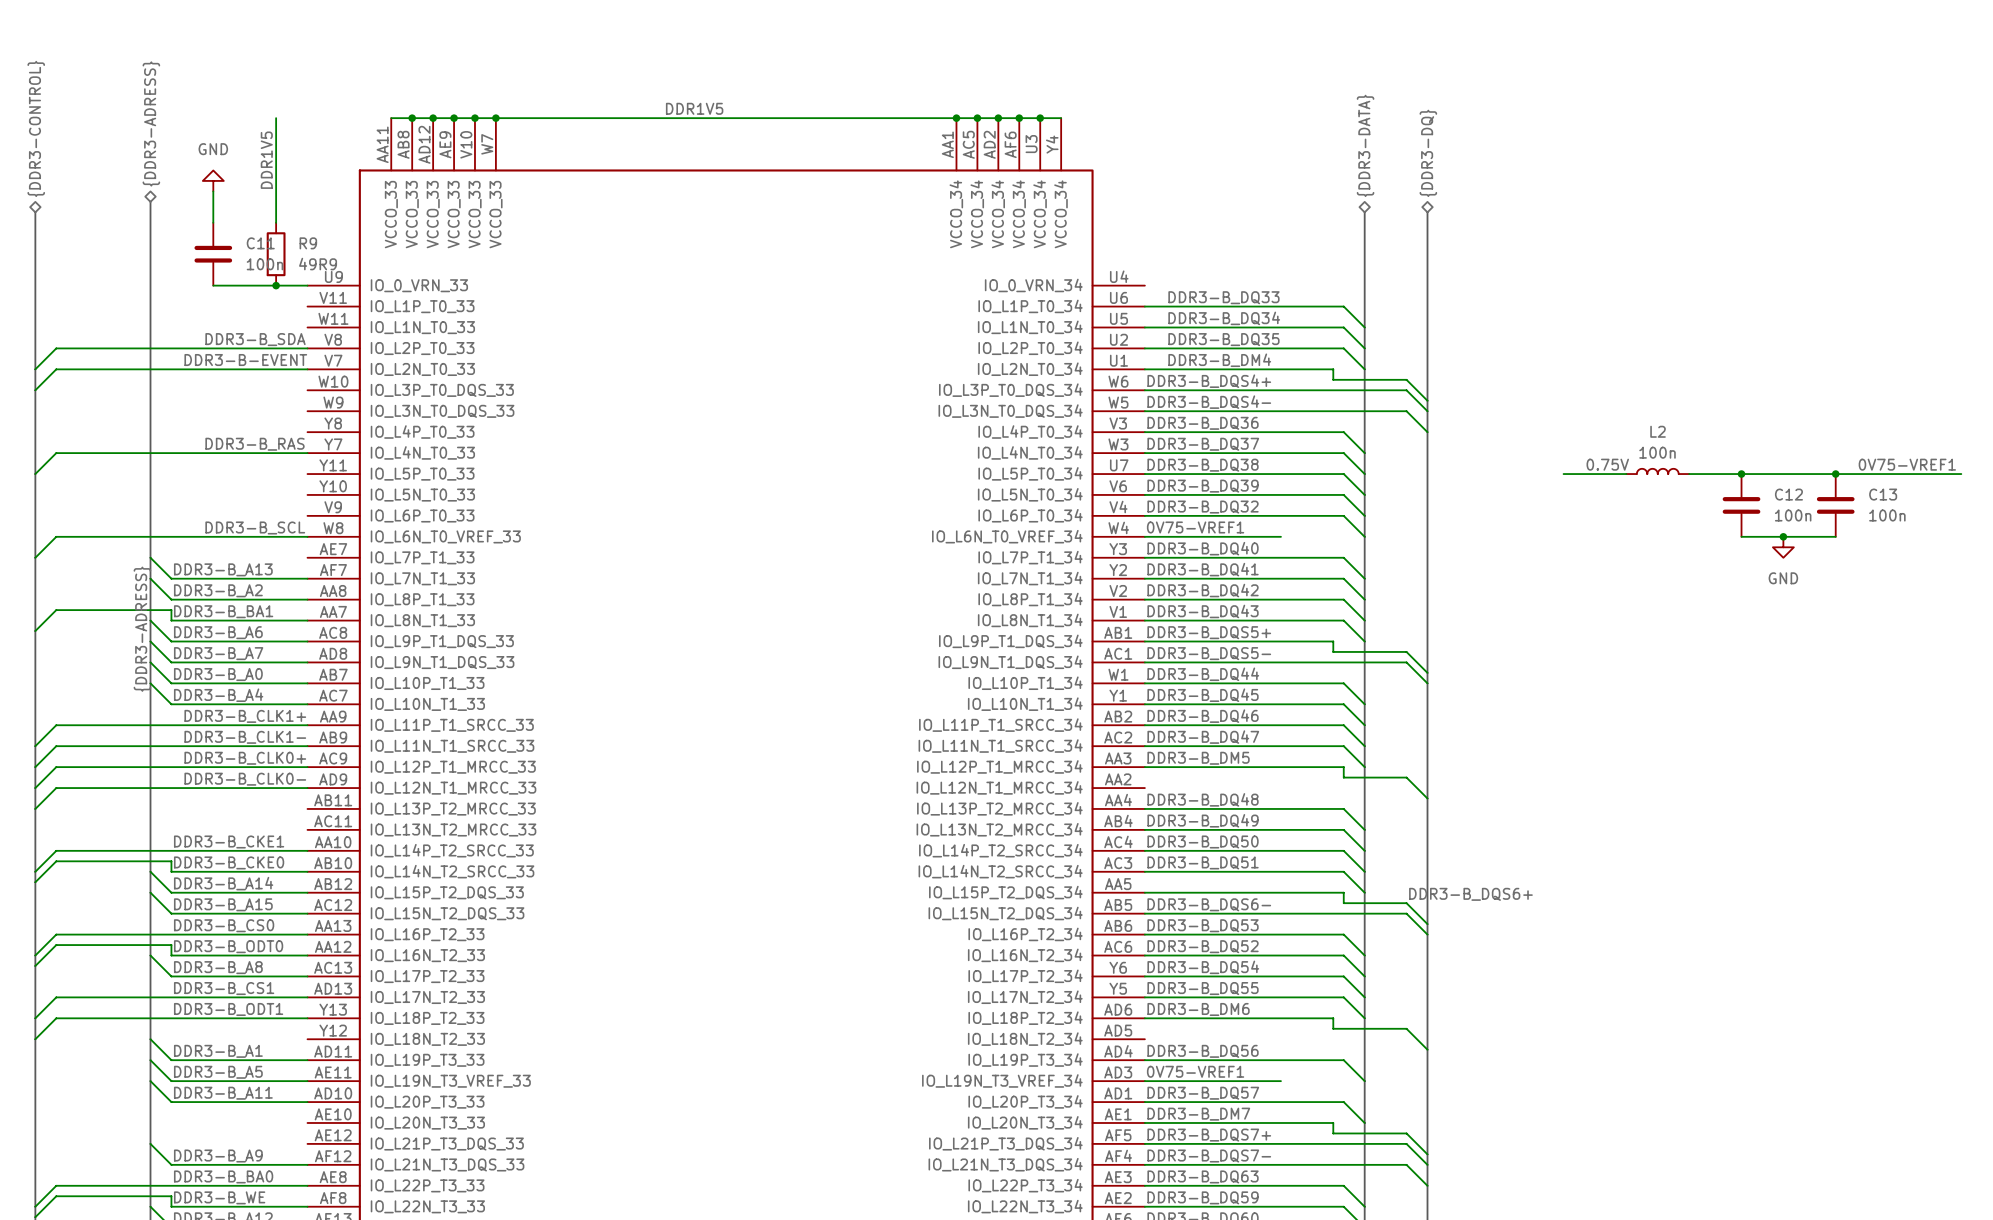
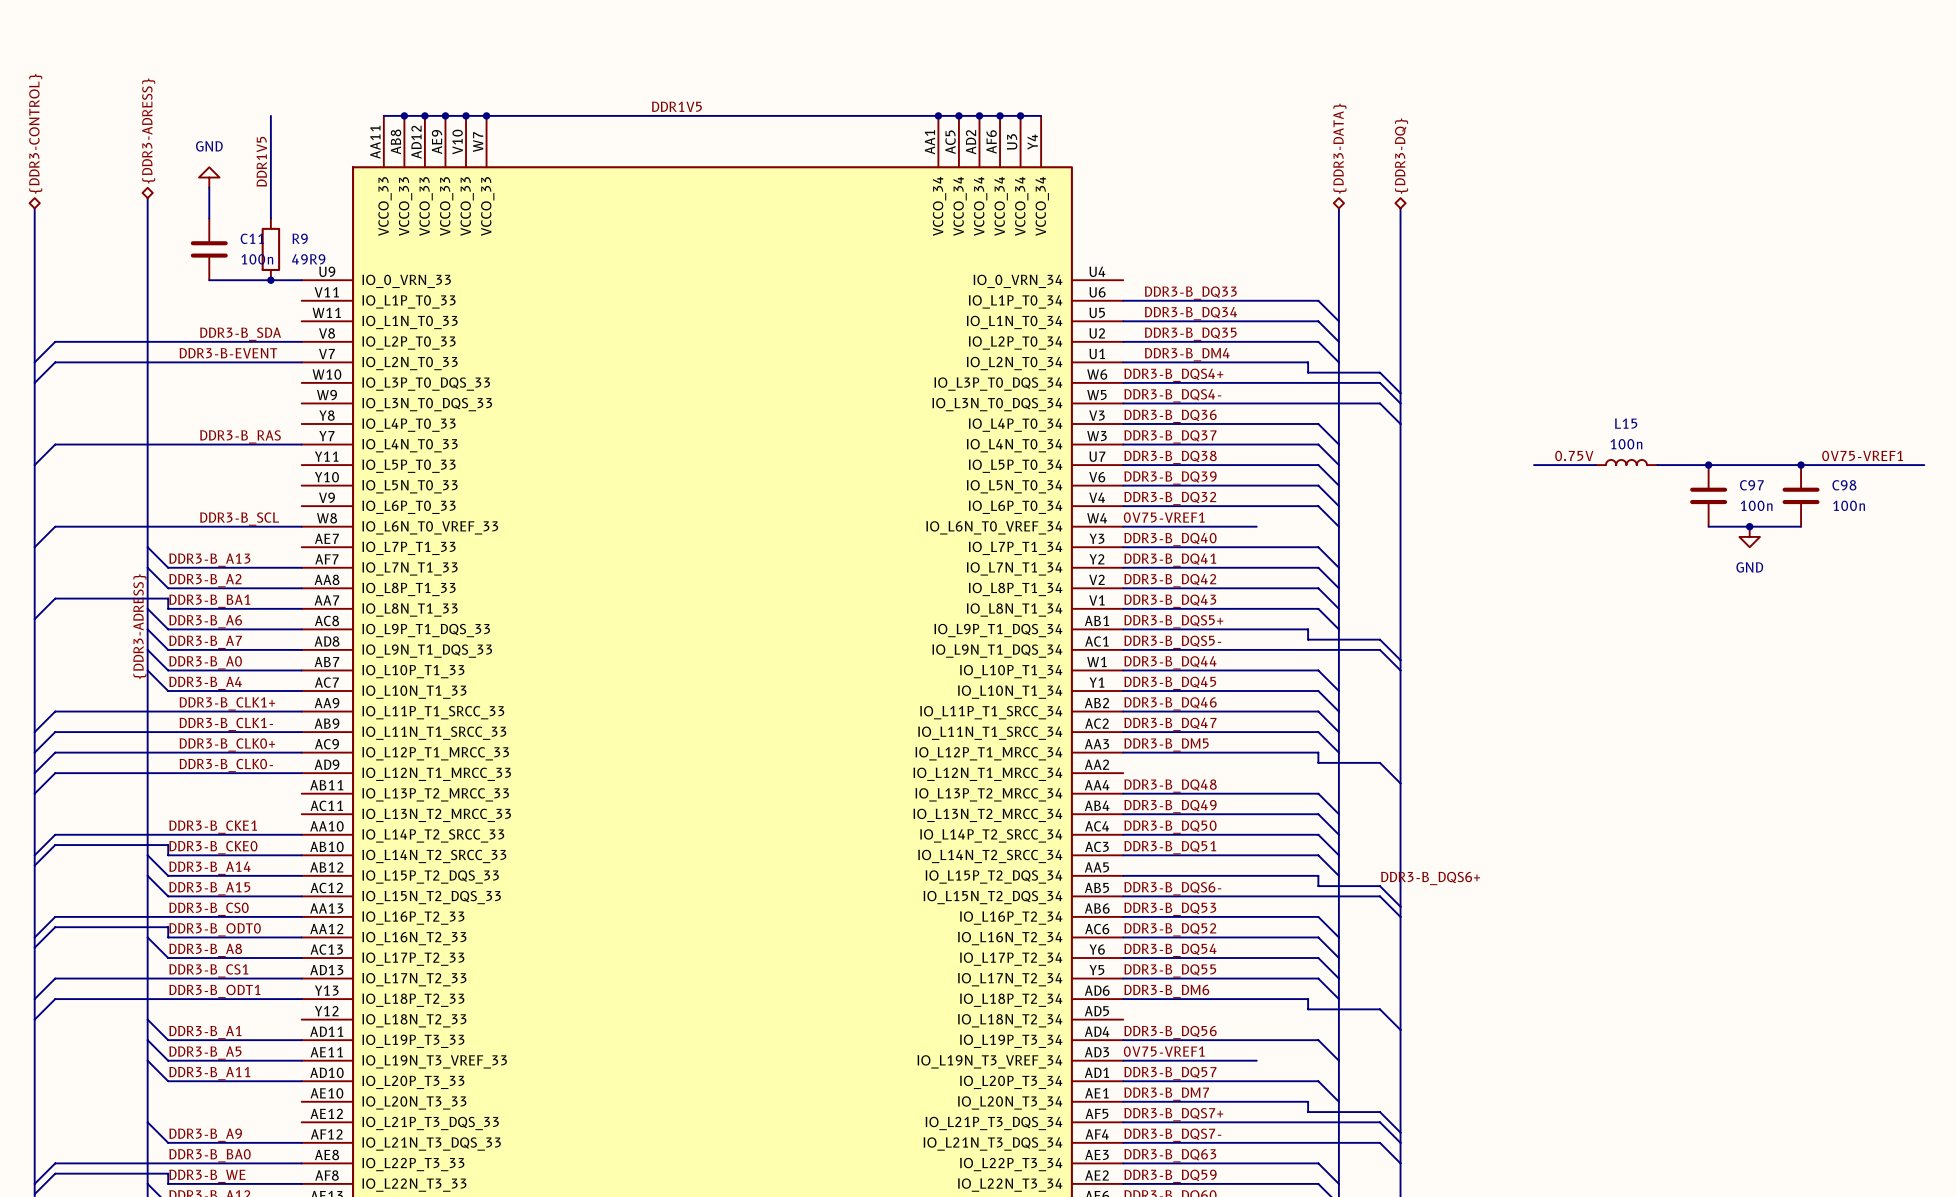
L2 name: L2 (1658, 431) -> L15 (1626, 423)
C12 name: C12 (1788, 494) -> C97 (1751, 485)
C13 name: C13 (1883, 494) -> C98 (1844, 485)

